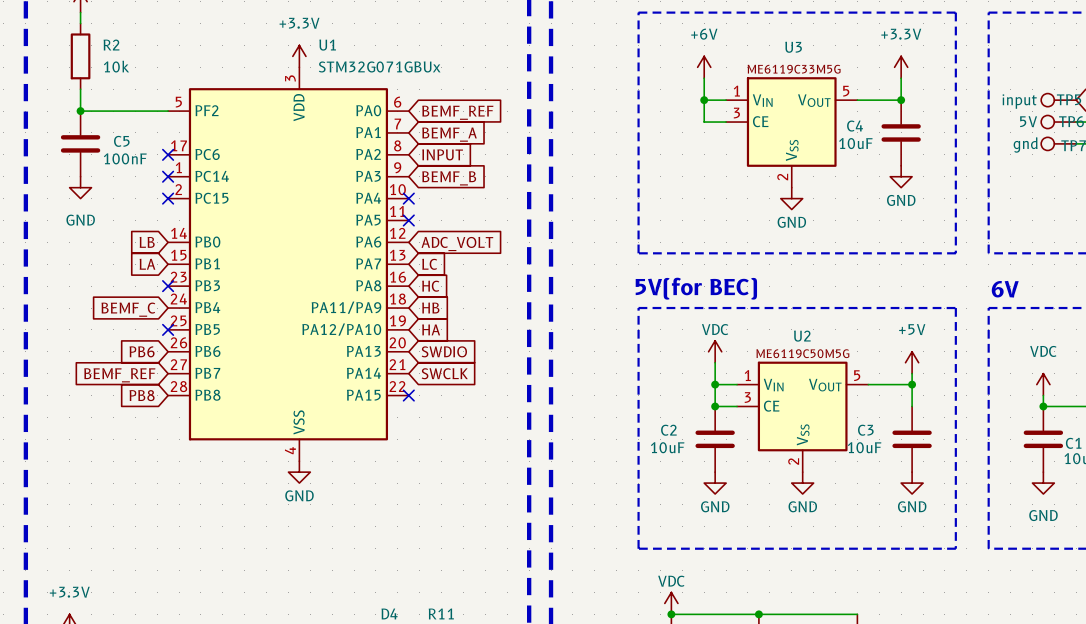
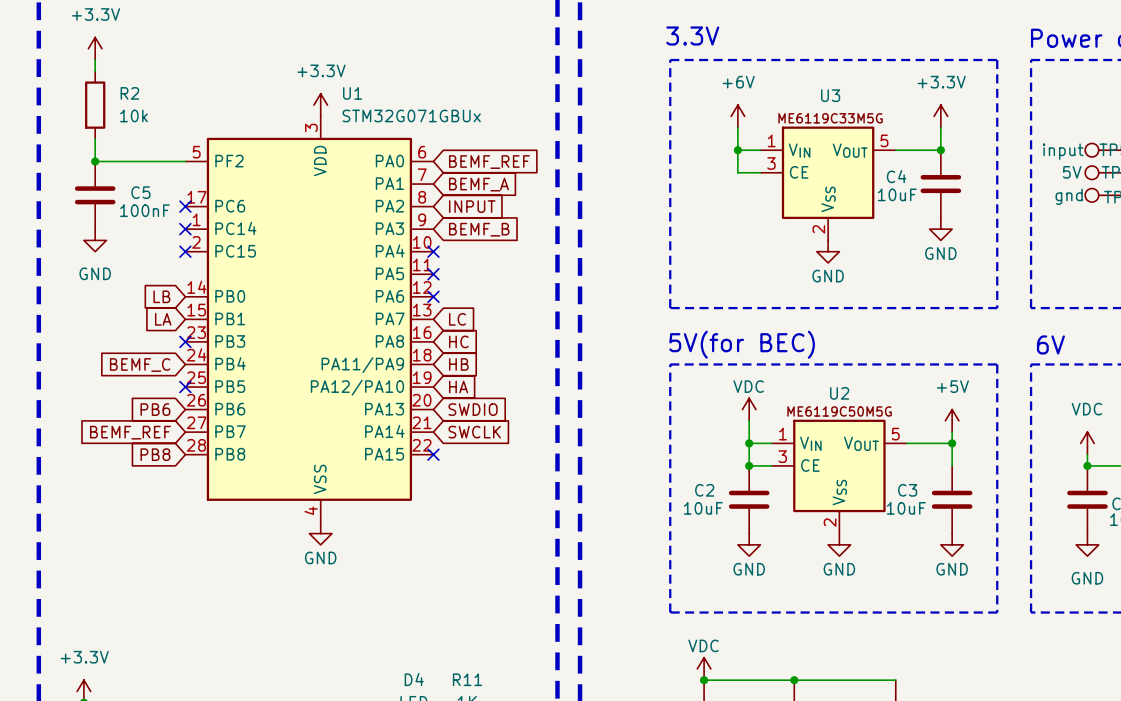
no-connect mark: none -> (433, 296)
global label: ADC_VOLT (457, 244) -> none

